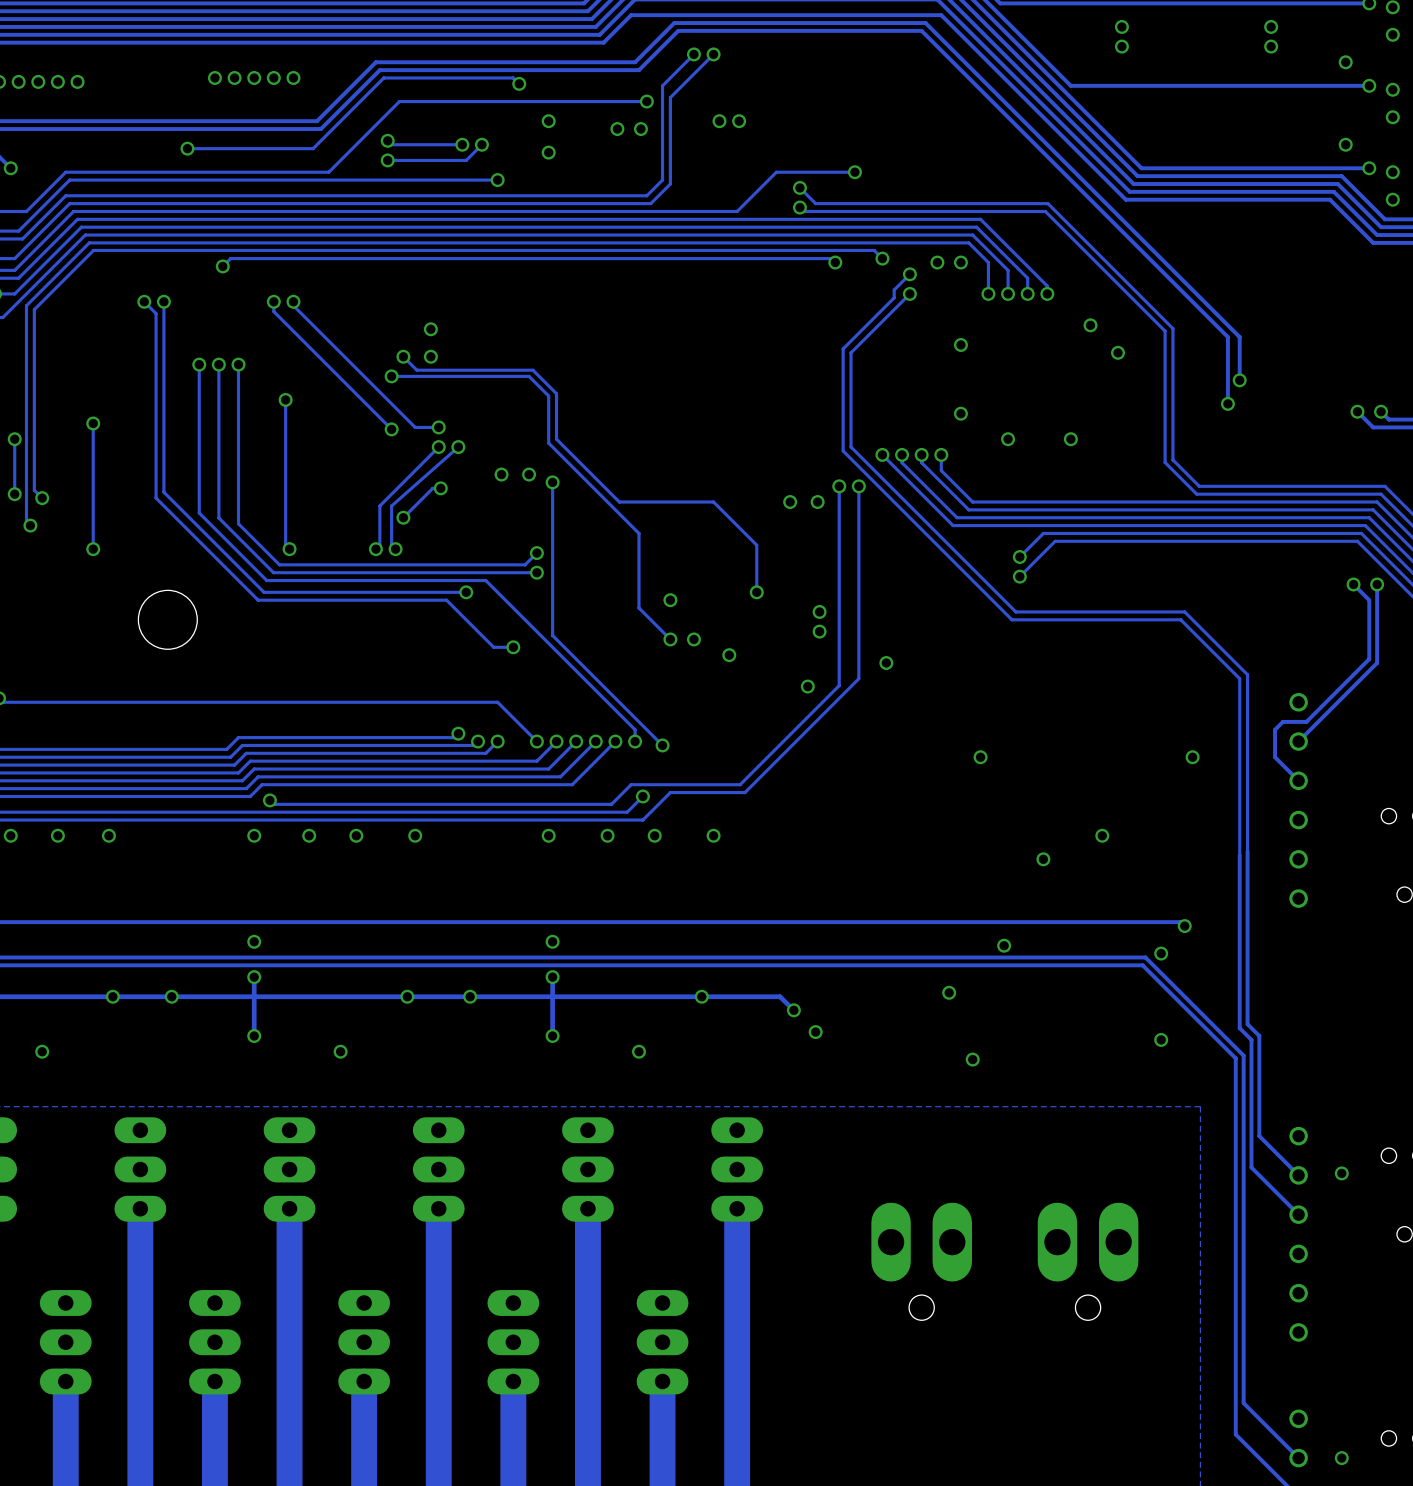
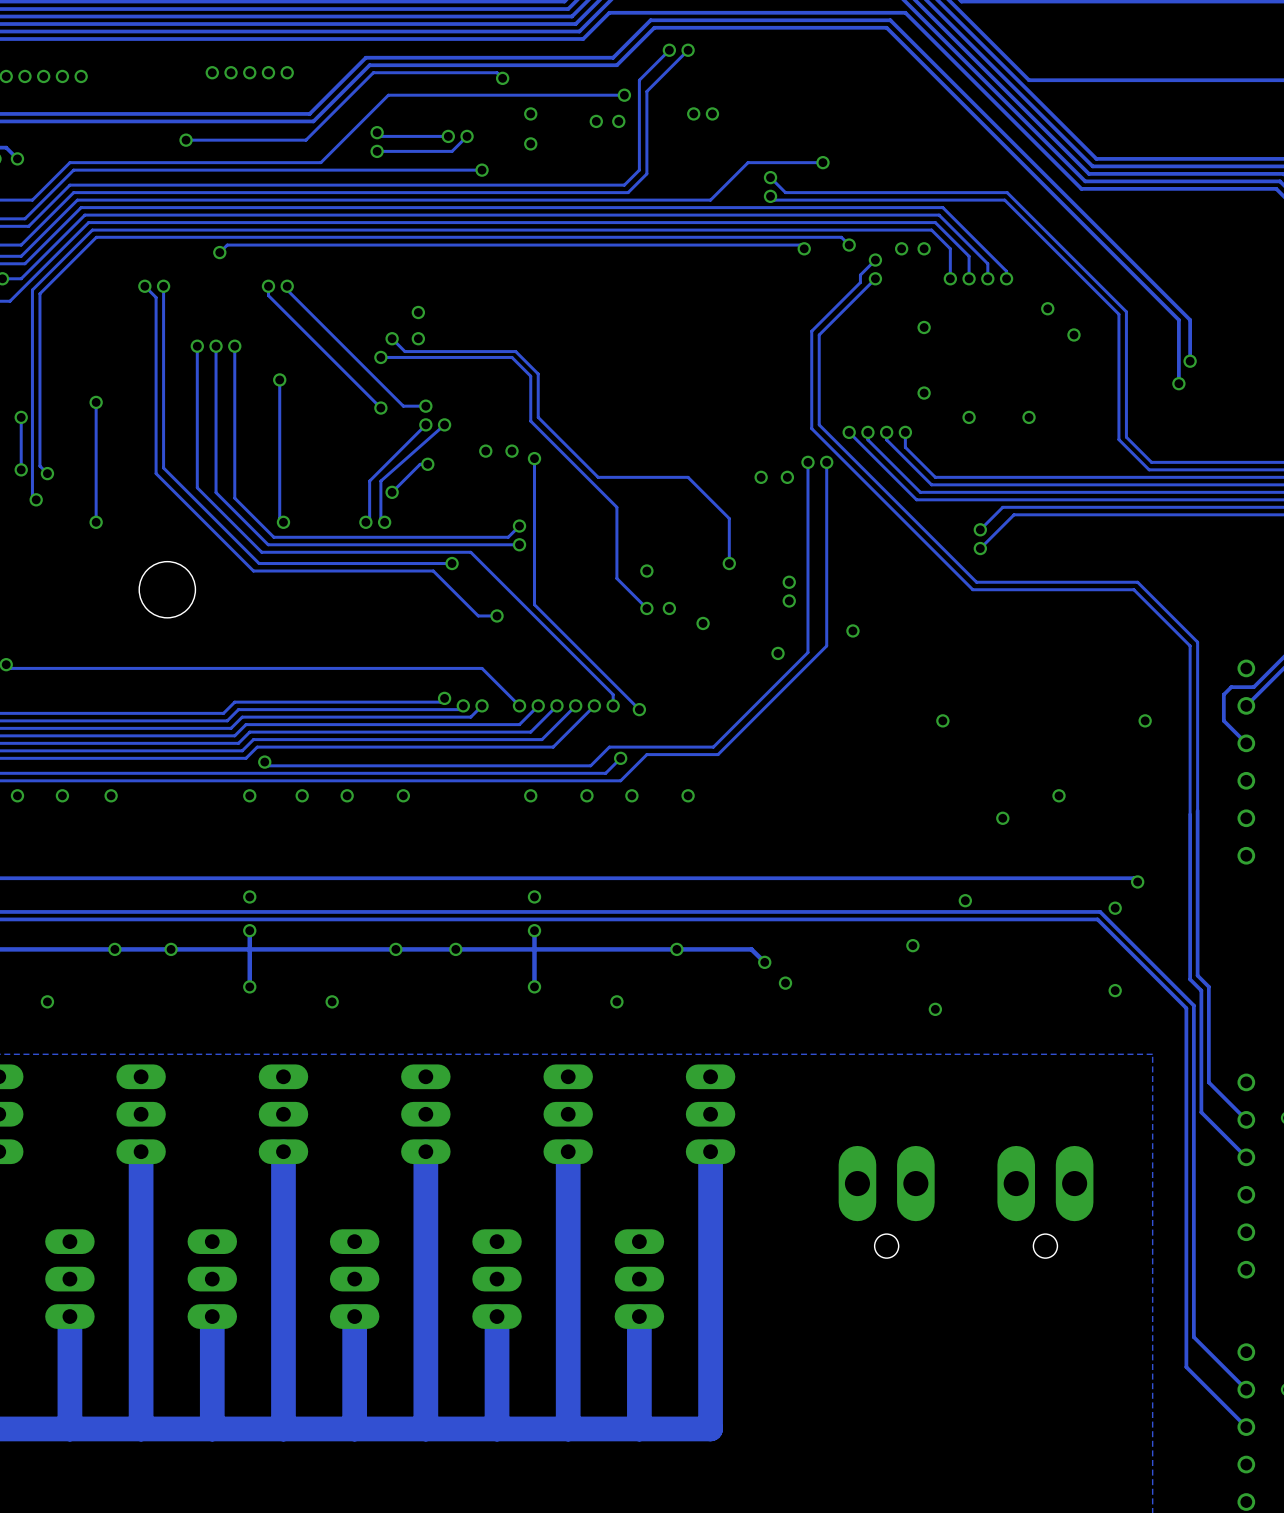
via: (1121, 26) -> none
via: (1271, 26) -> none
via: (1121, 46) -> none
via: (1271, 46) -> none

